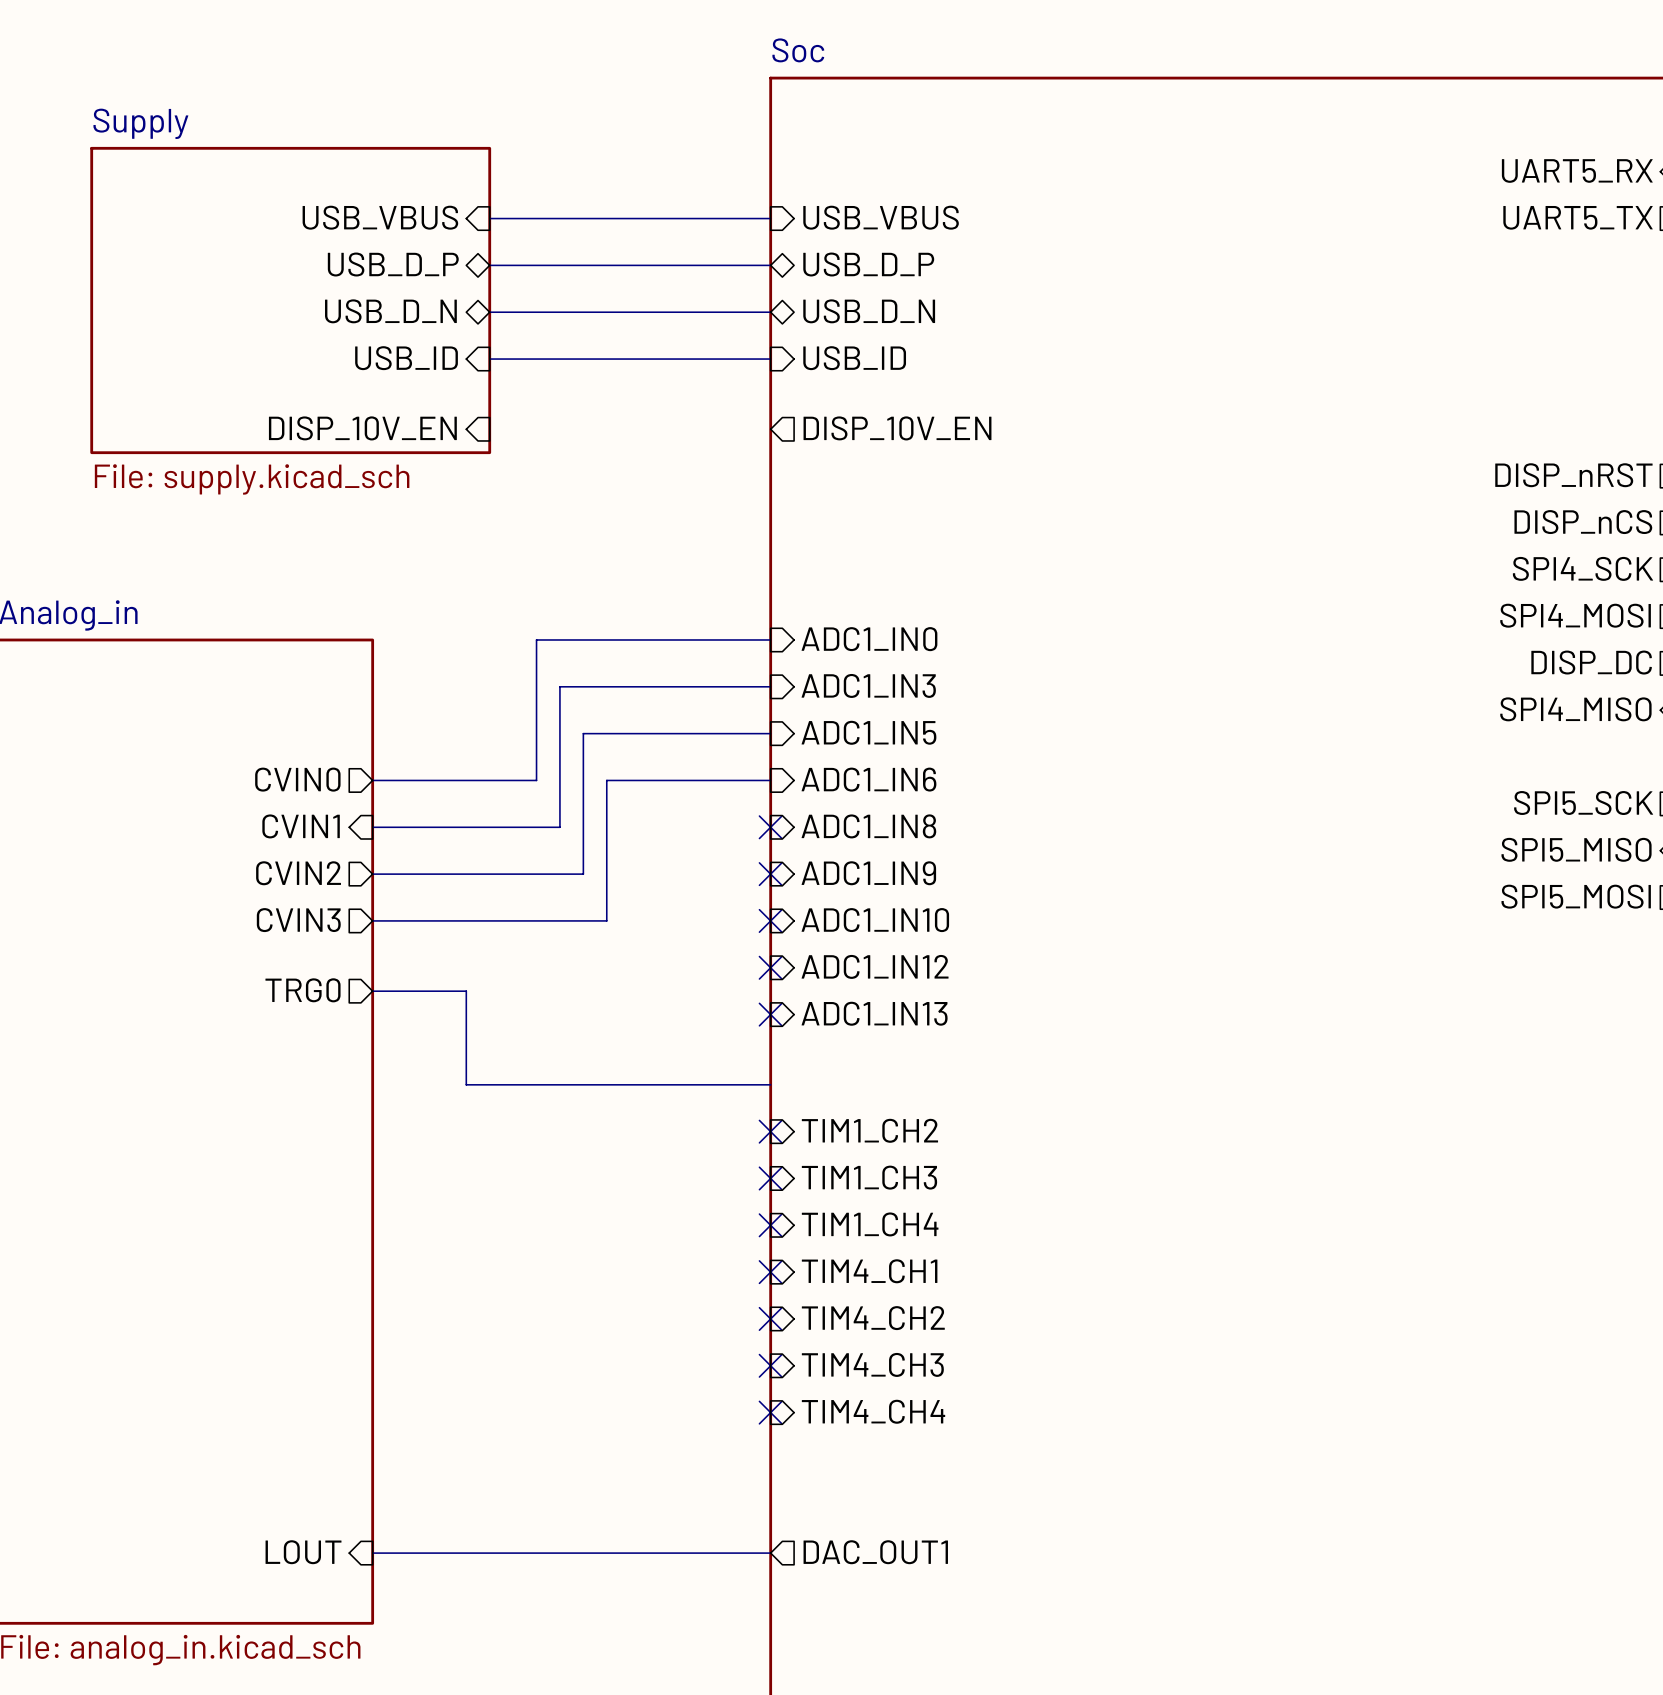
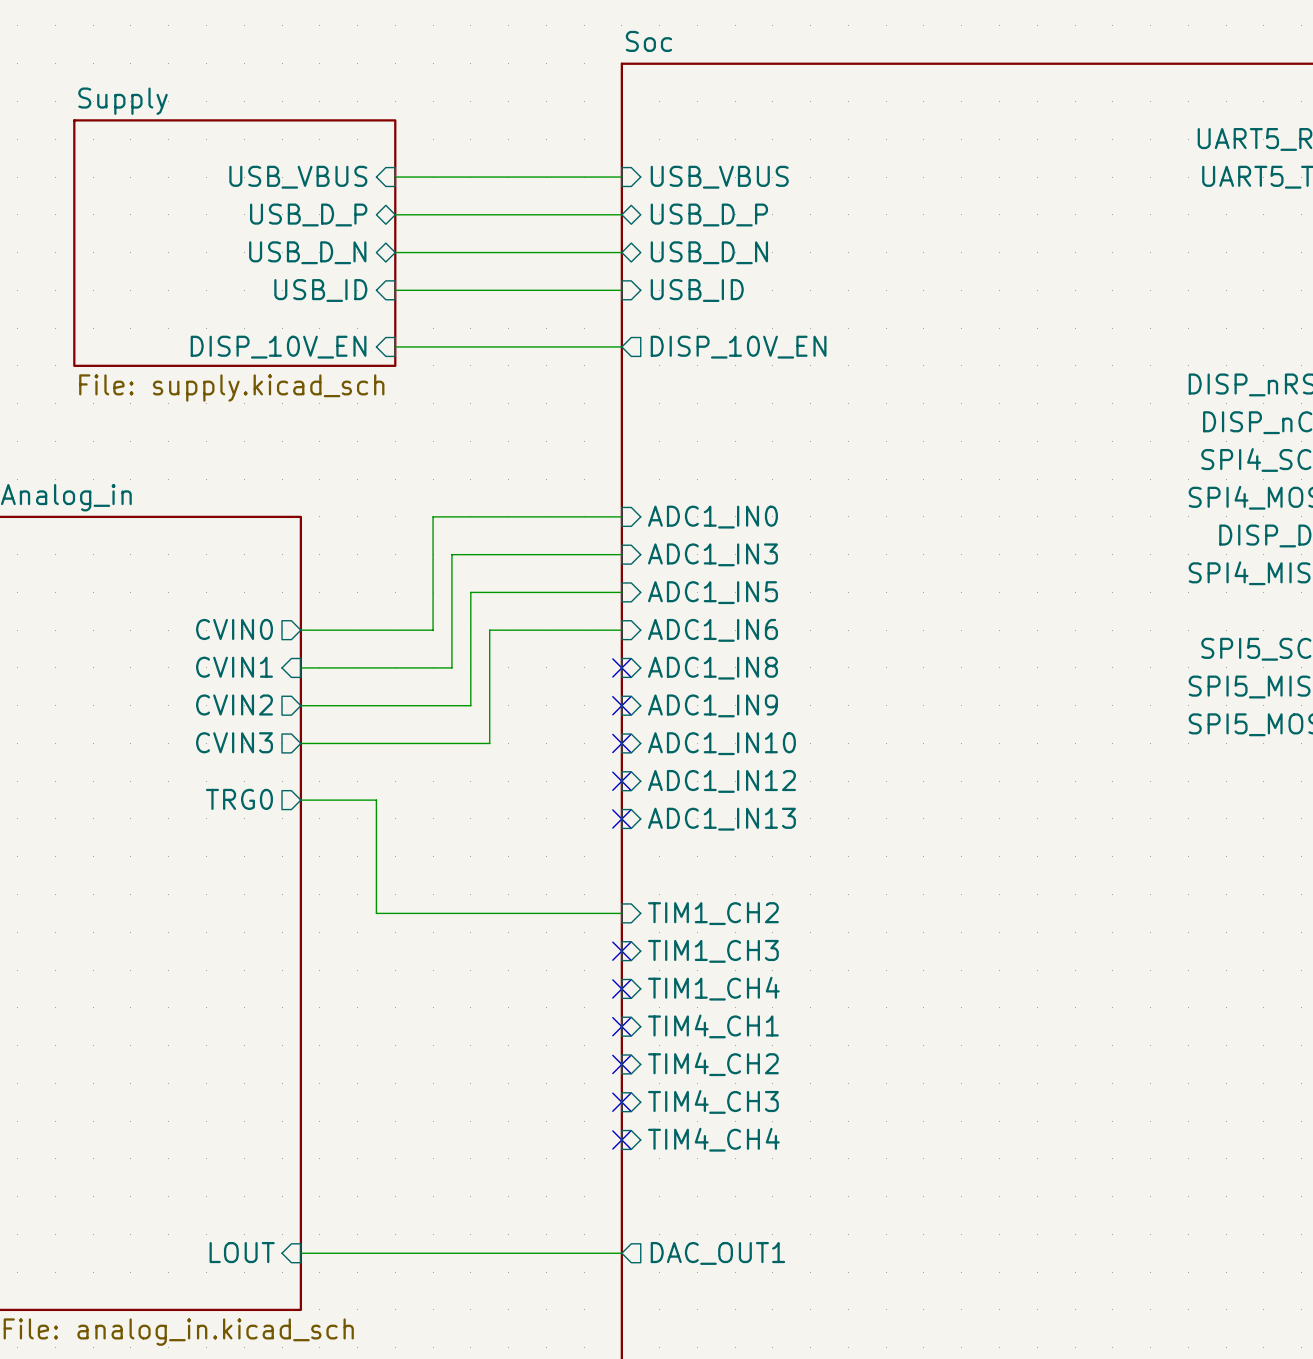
wire: none -> (395, 346) (621, 346)
wire: (466, 1084) (770, 1084) -> (376, 875) (376, 913) (621, 913)
no-connect mark: (770, 1131) -> none

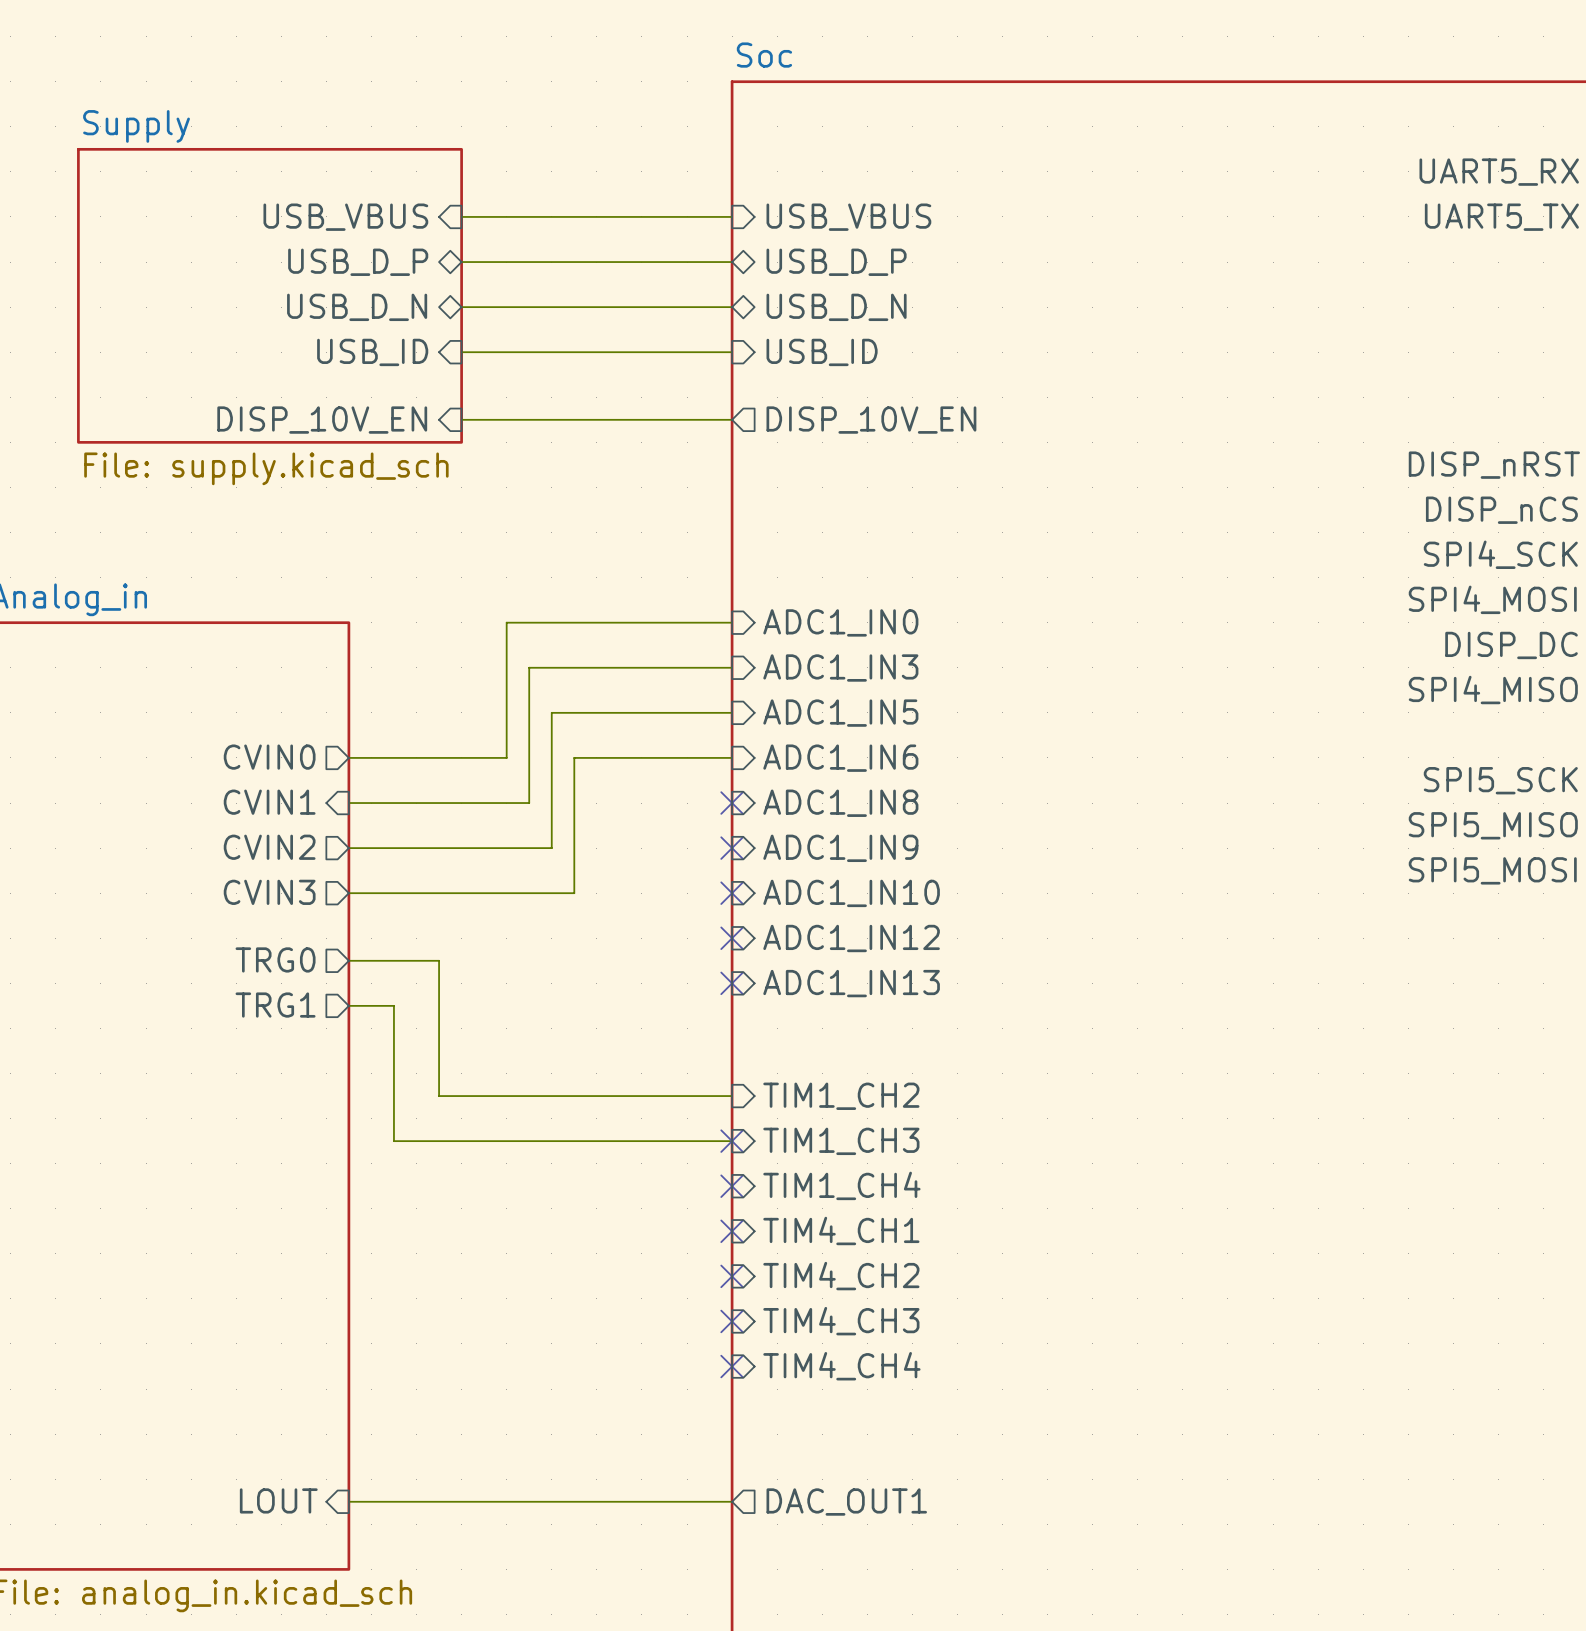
sheet pin: none -> TRG1 (275, 1005)
wire: none -> (348, 1005) (393, 1005) (393, 1141) (732, 1141)

